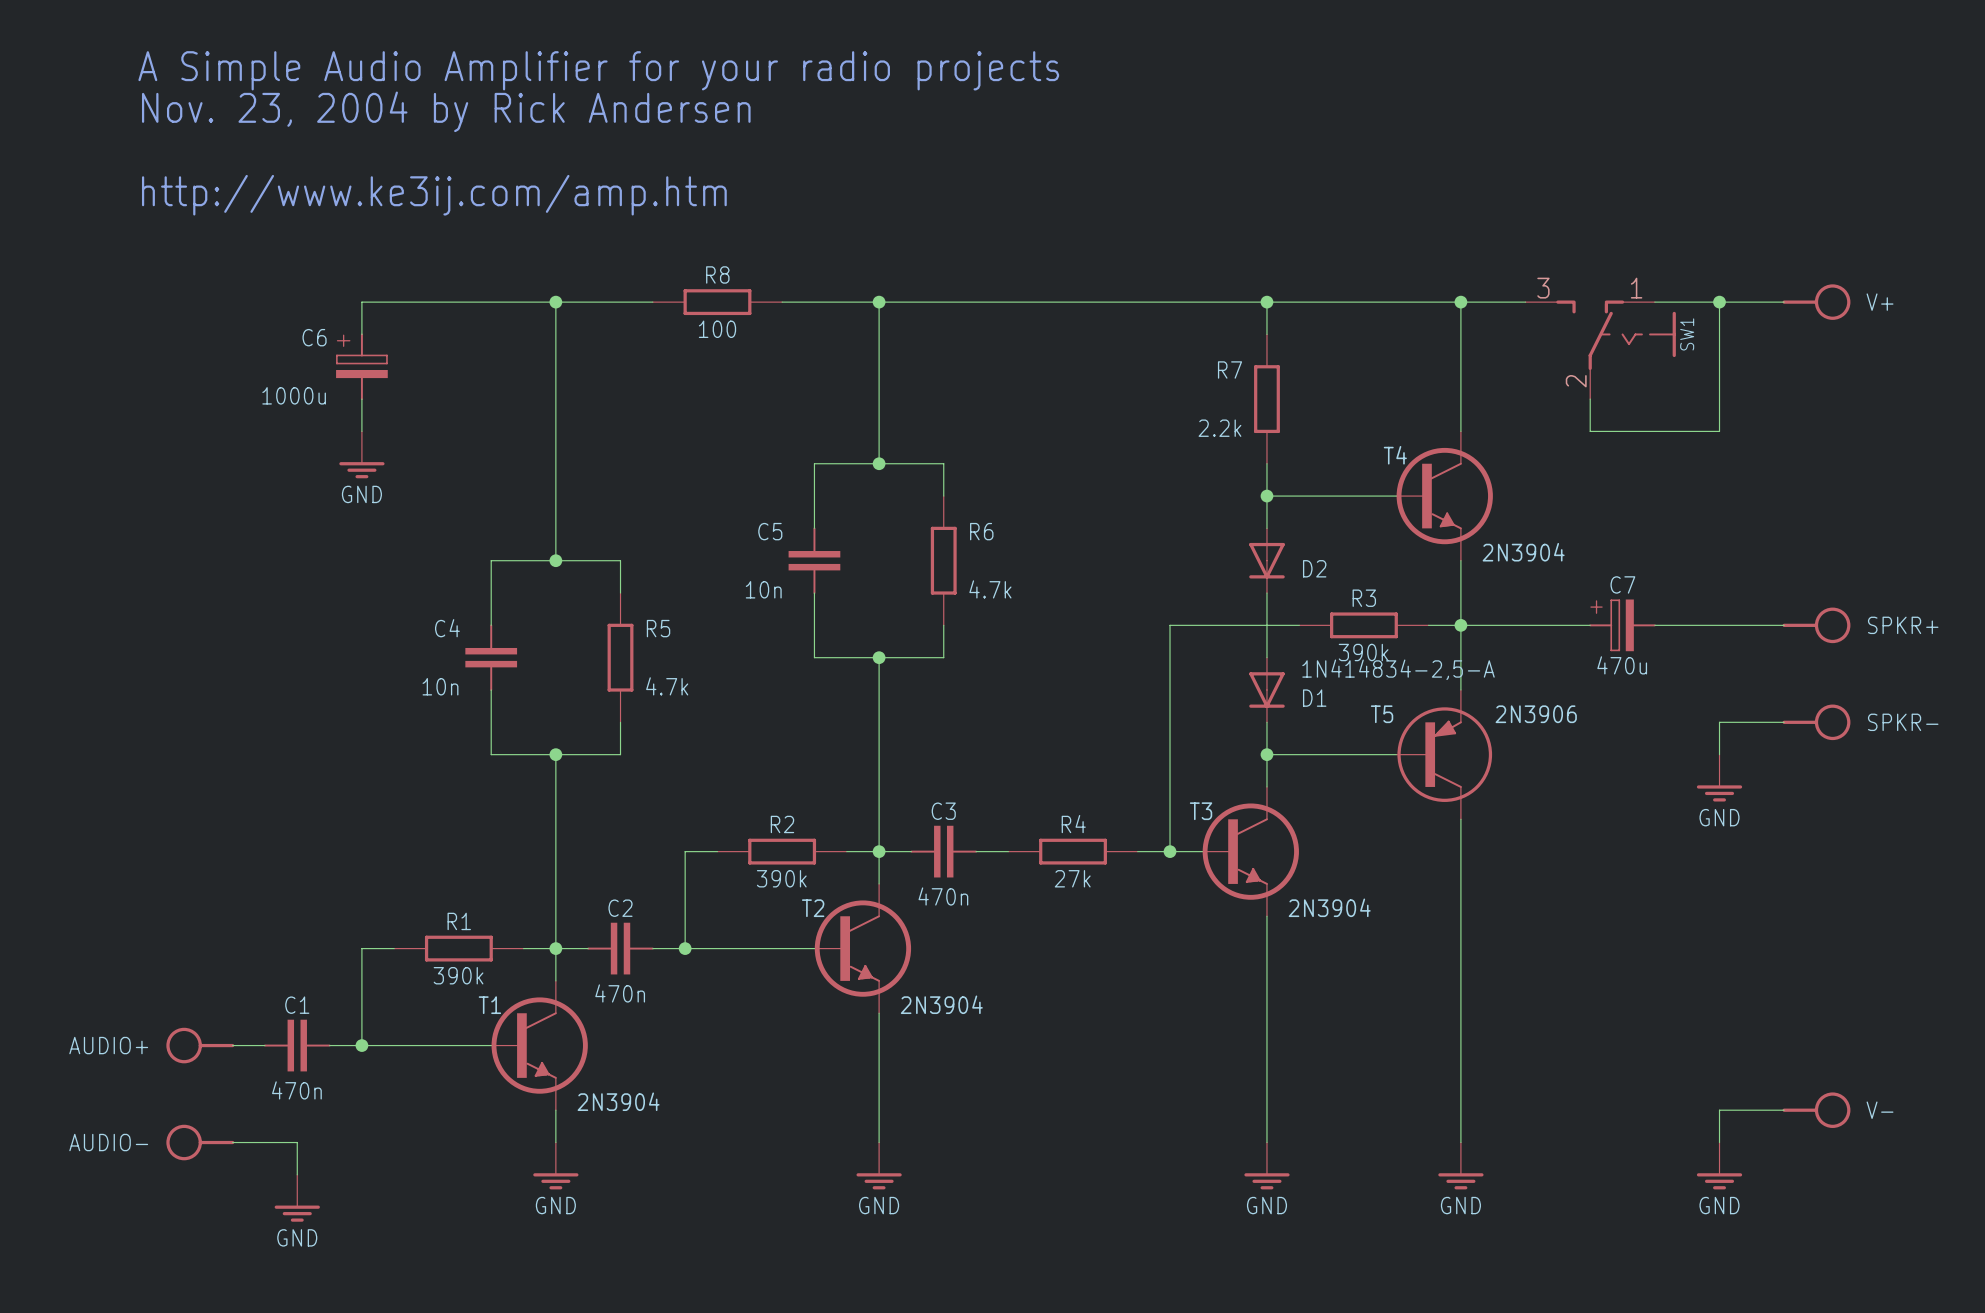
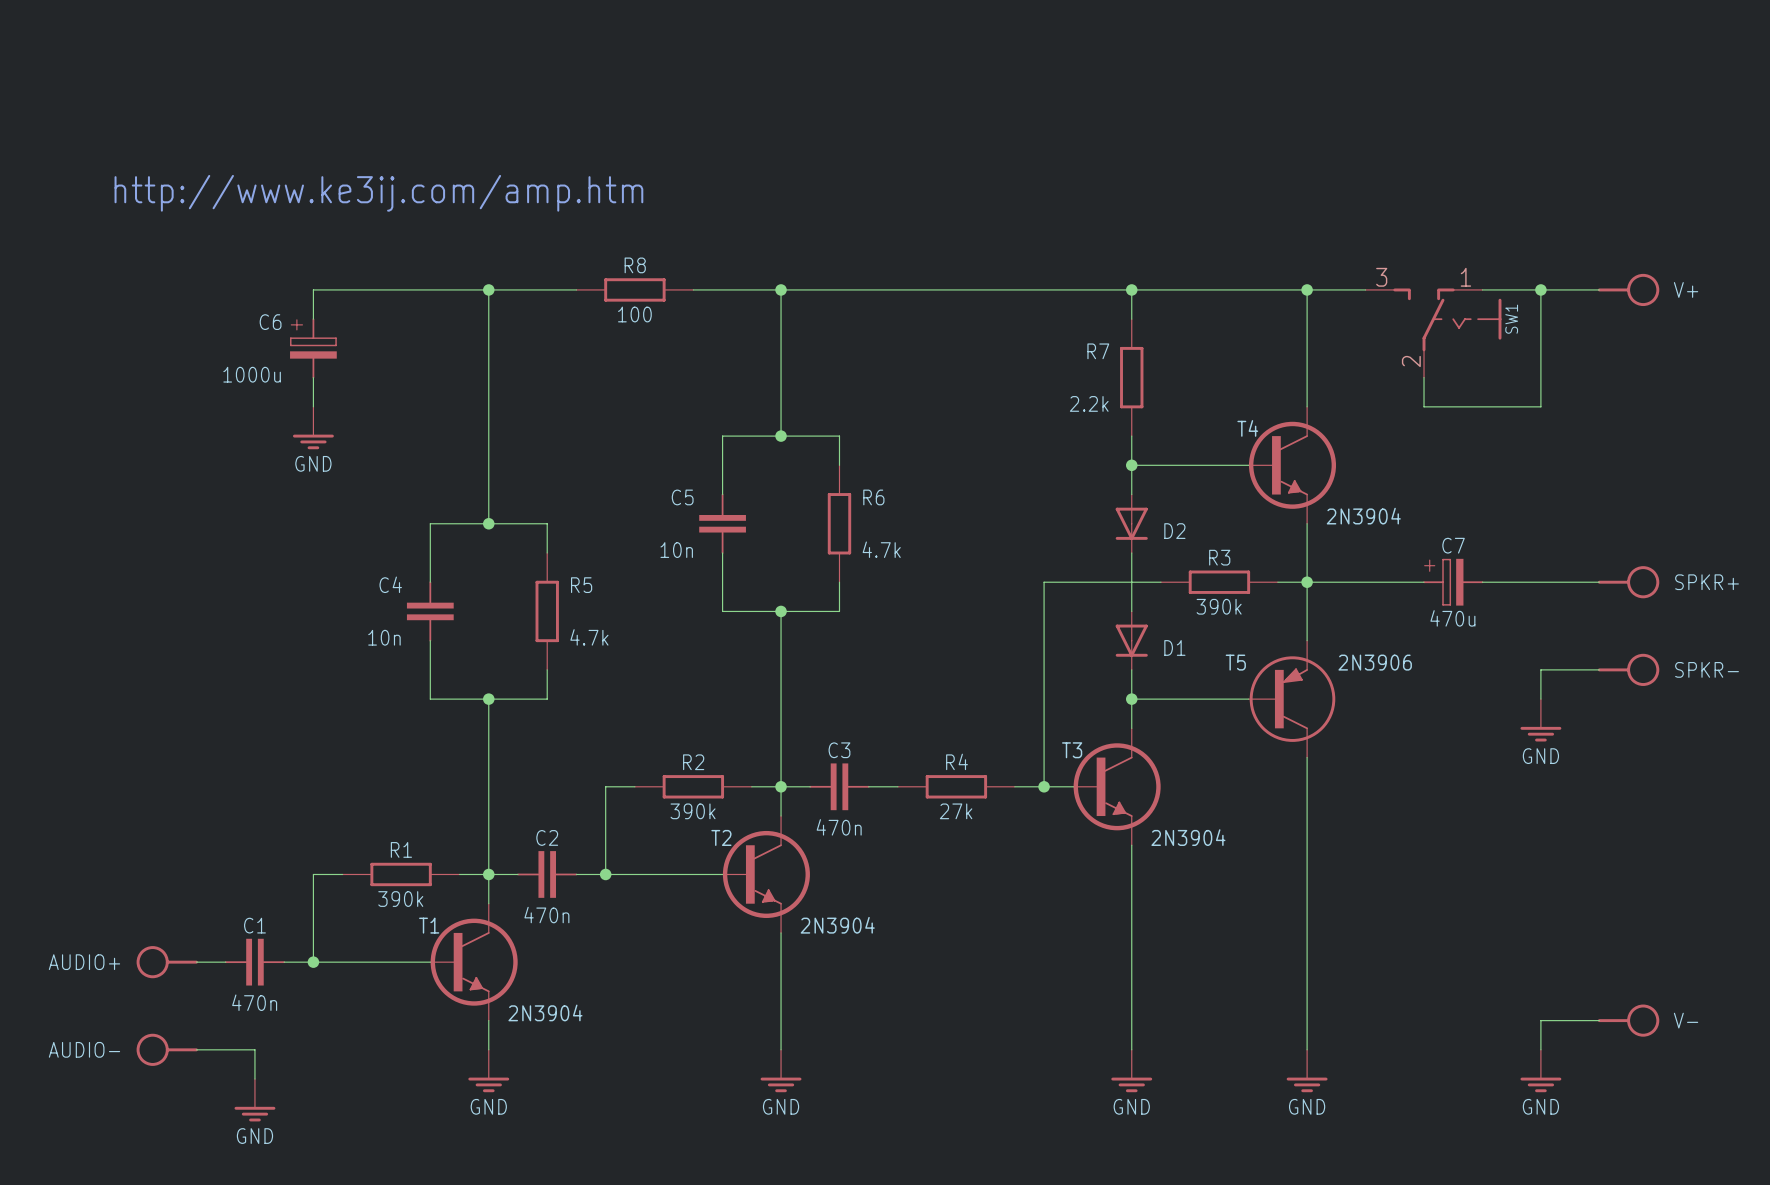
text: A Simple Audio Amplifier for your radio projects (598, 70) -> none
text: Nov. 23, 2004 by Rick Andersen (446, 111) -> none
D1 value: 1N414834-2,5-A (1398, 669) -> none

